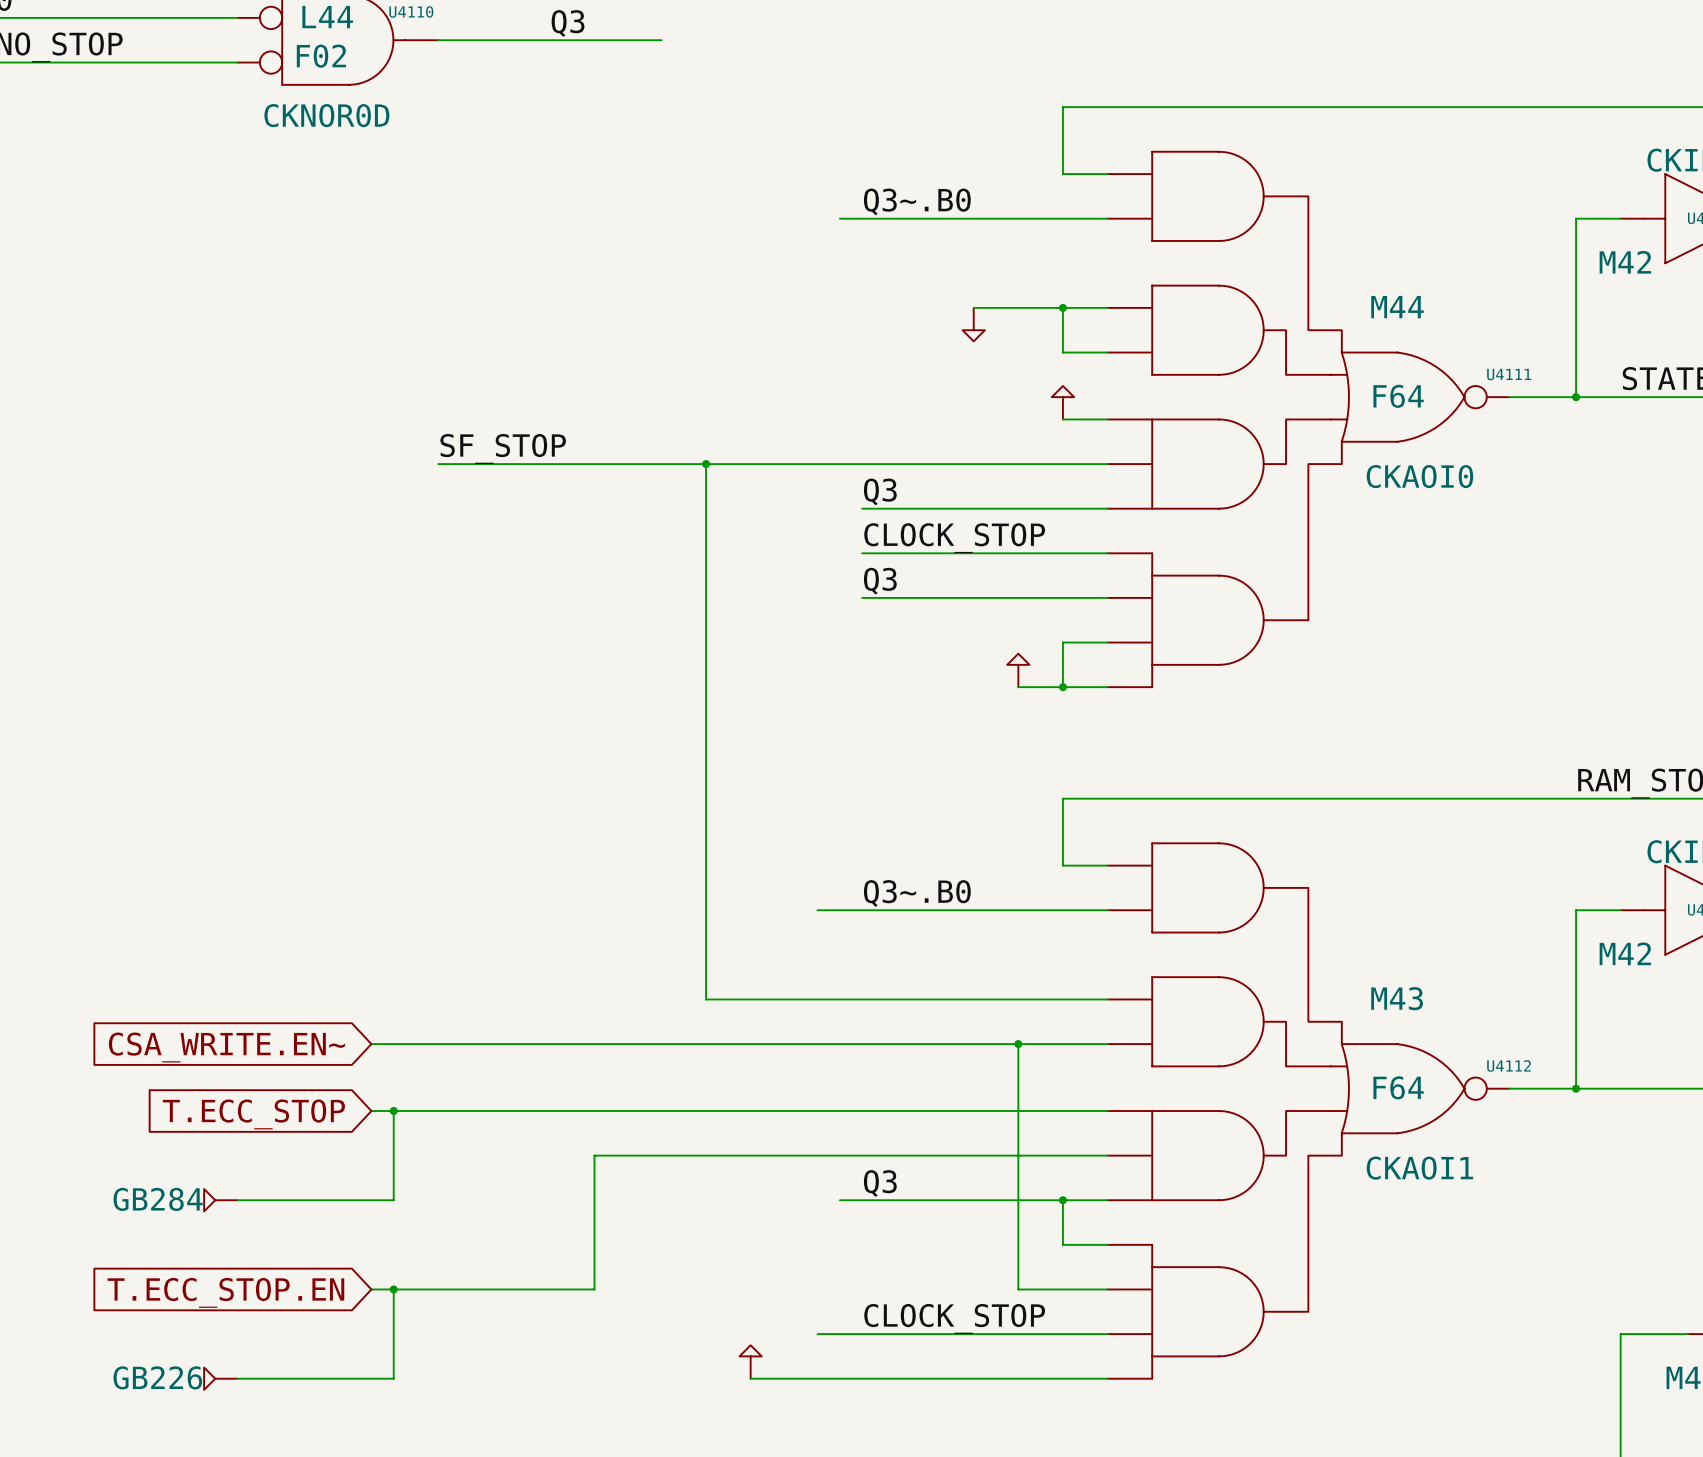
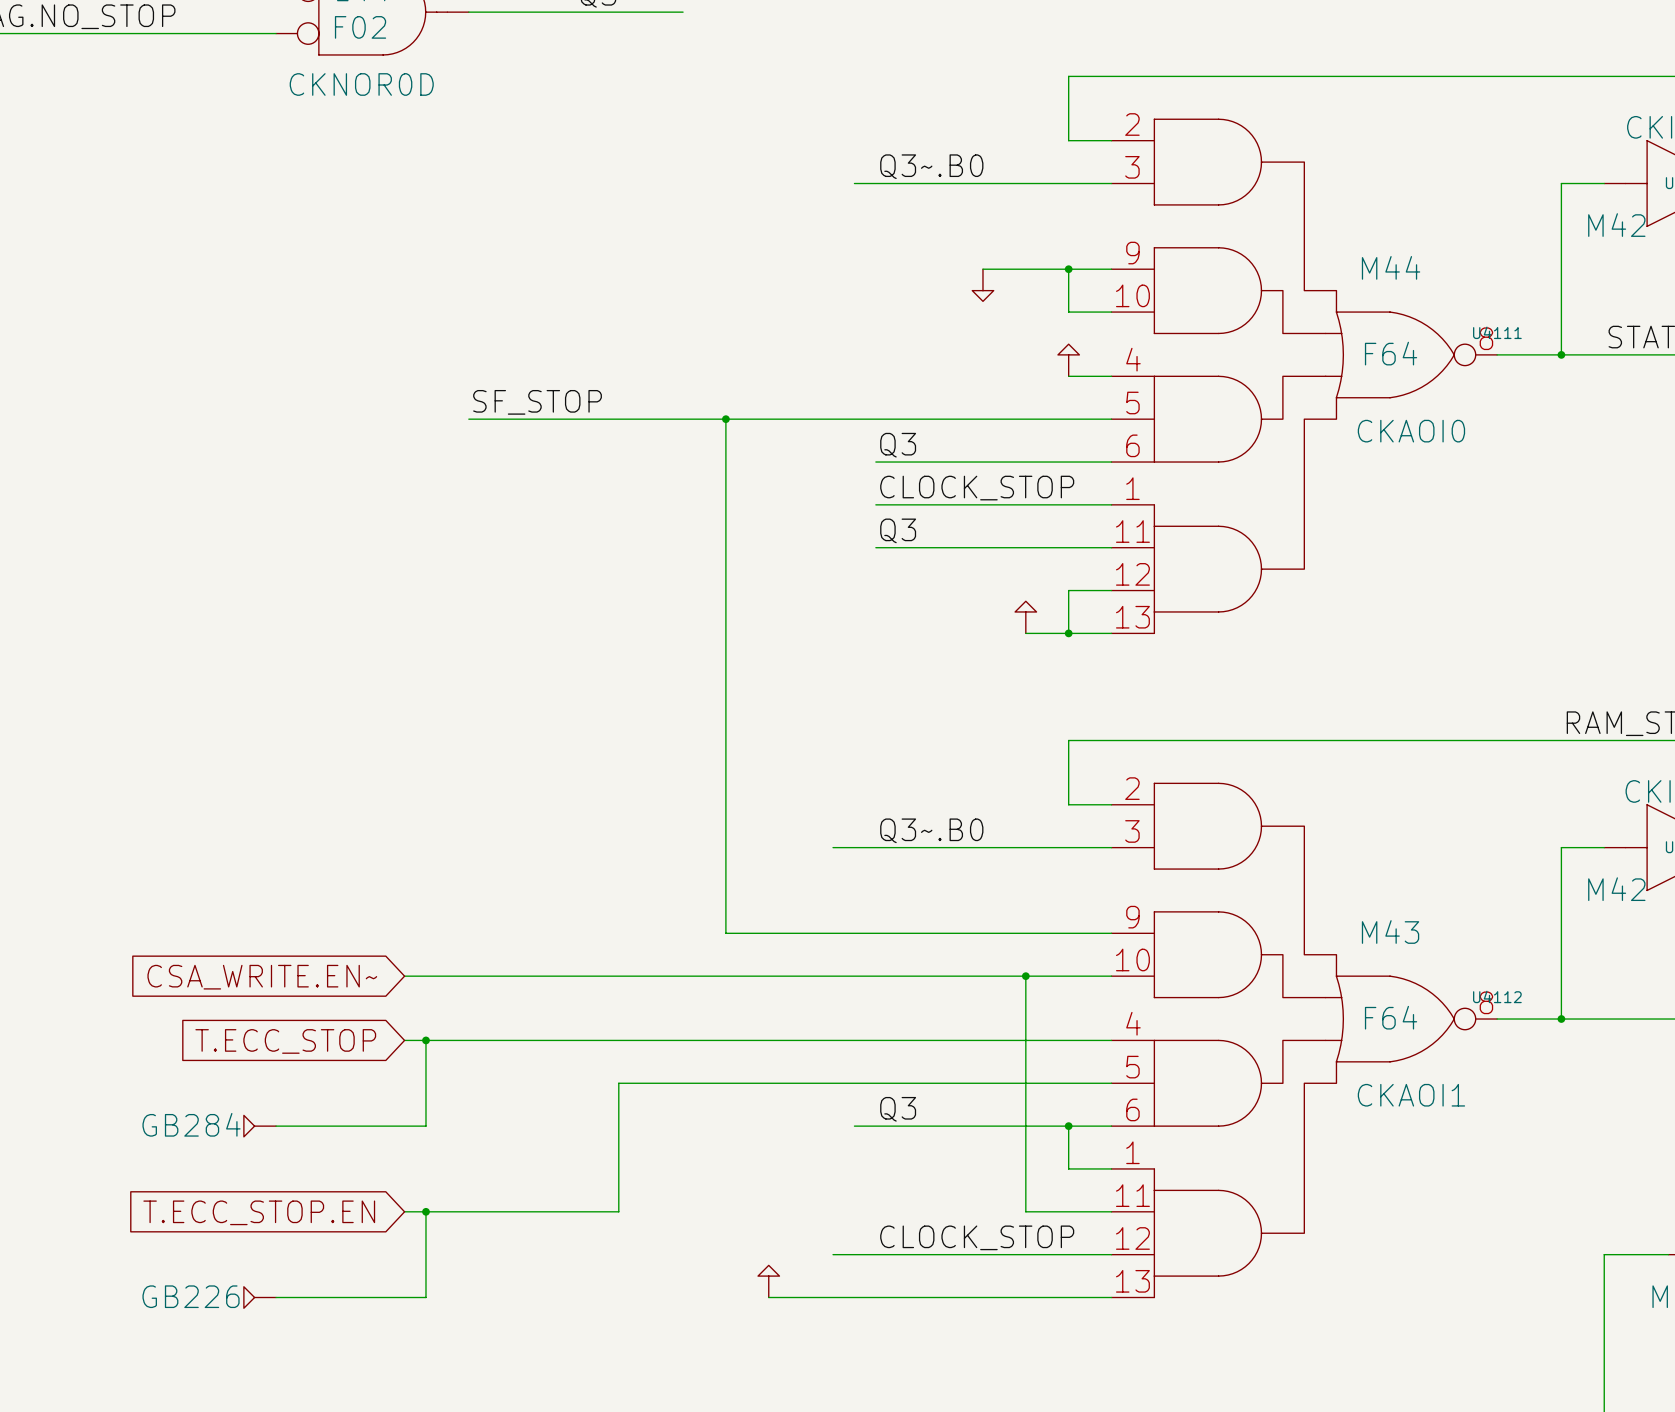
U4111 symbol: [1107, 151, 1510, 688] -> [1111, 118, 1498, 635]
U4112 symbol: [1107, 842, 1510, 1380] -> [1111, 782, 1498, 1299]

